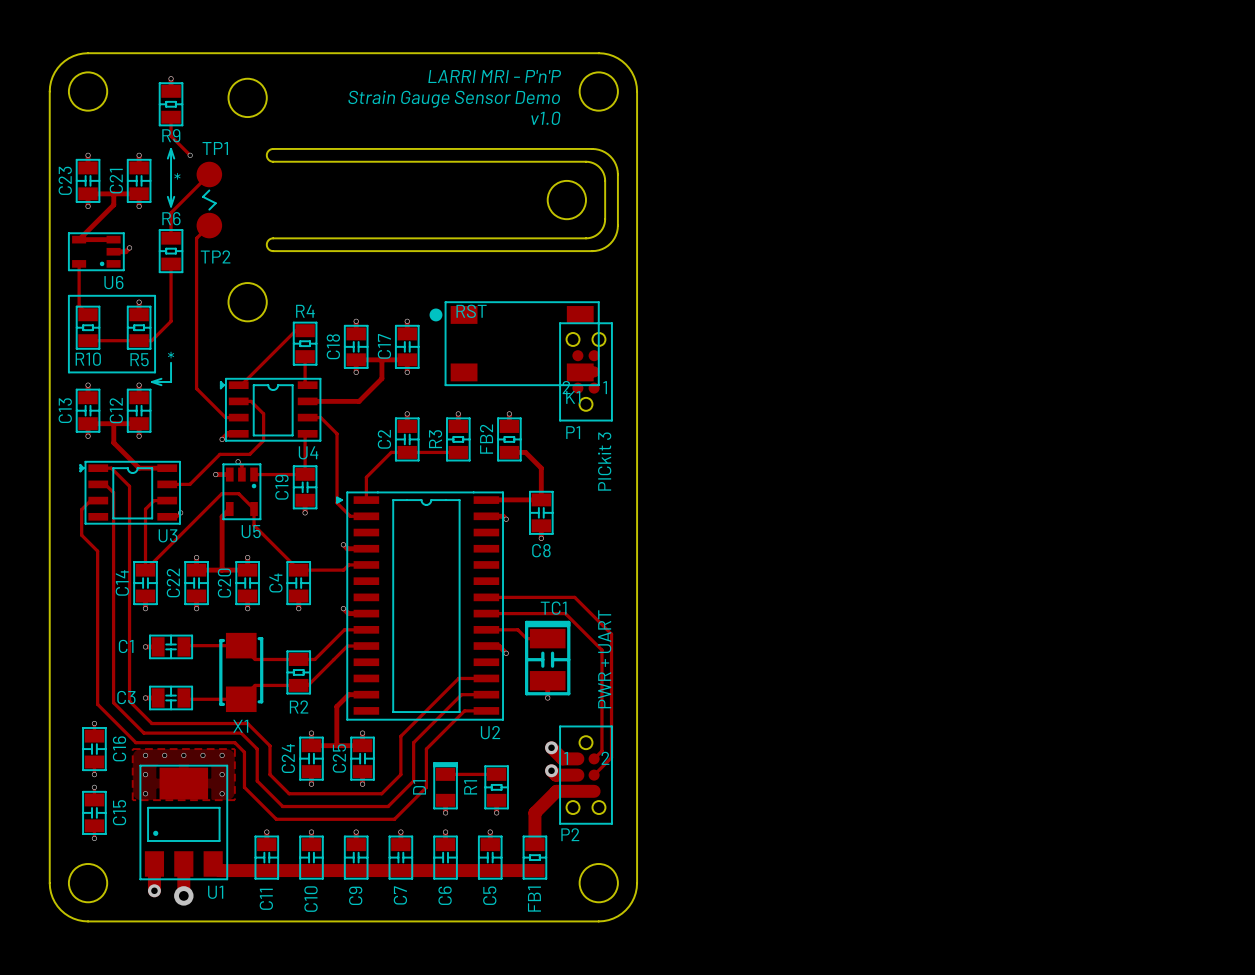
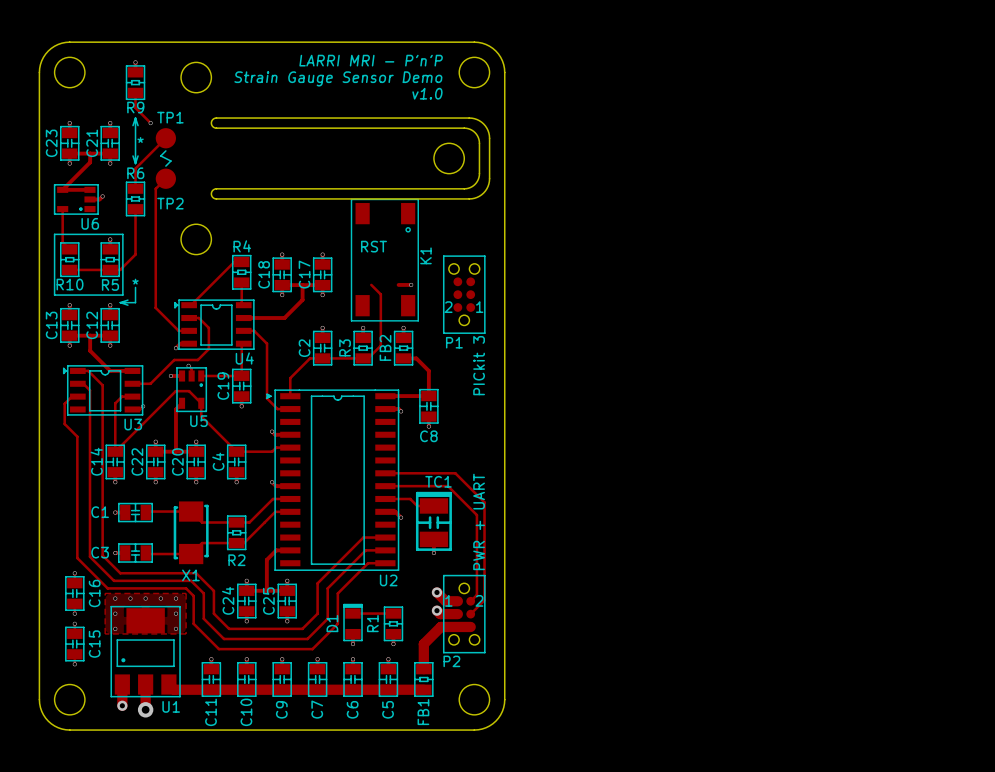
K1 footprint: [429, 301, 600, 387] -> [350, 198, 419, 322]
track: none -> (371, 284) (380, 294) (380, 345) (368, 358) (363, 358)
track: none -> (398, 284) (411, 284)
via: none -> (411, 284)
K1 name position: K1 (573, 397) -> K1 (425, 255)

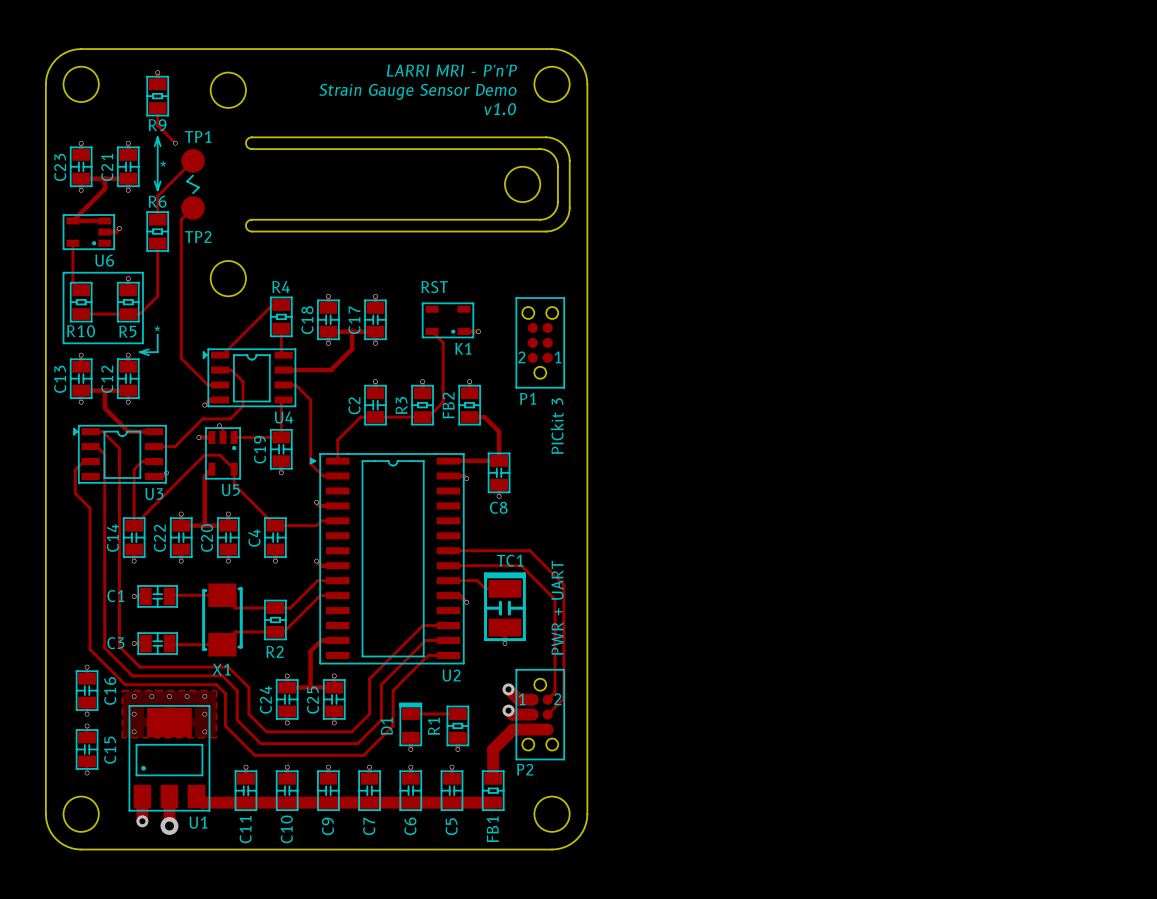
K1 footprint: [350, 198, 419, 322] -> [421, 302, 475, 339]
K1 name position: K1 (425, 255) -> K1 (463, 348)

